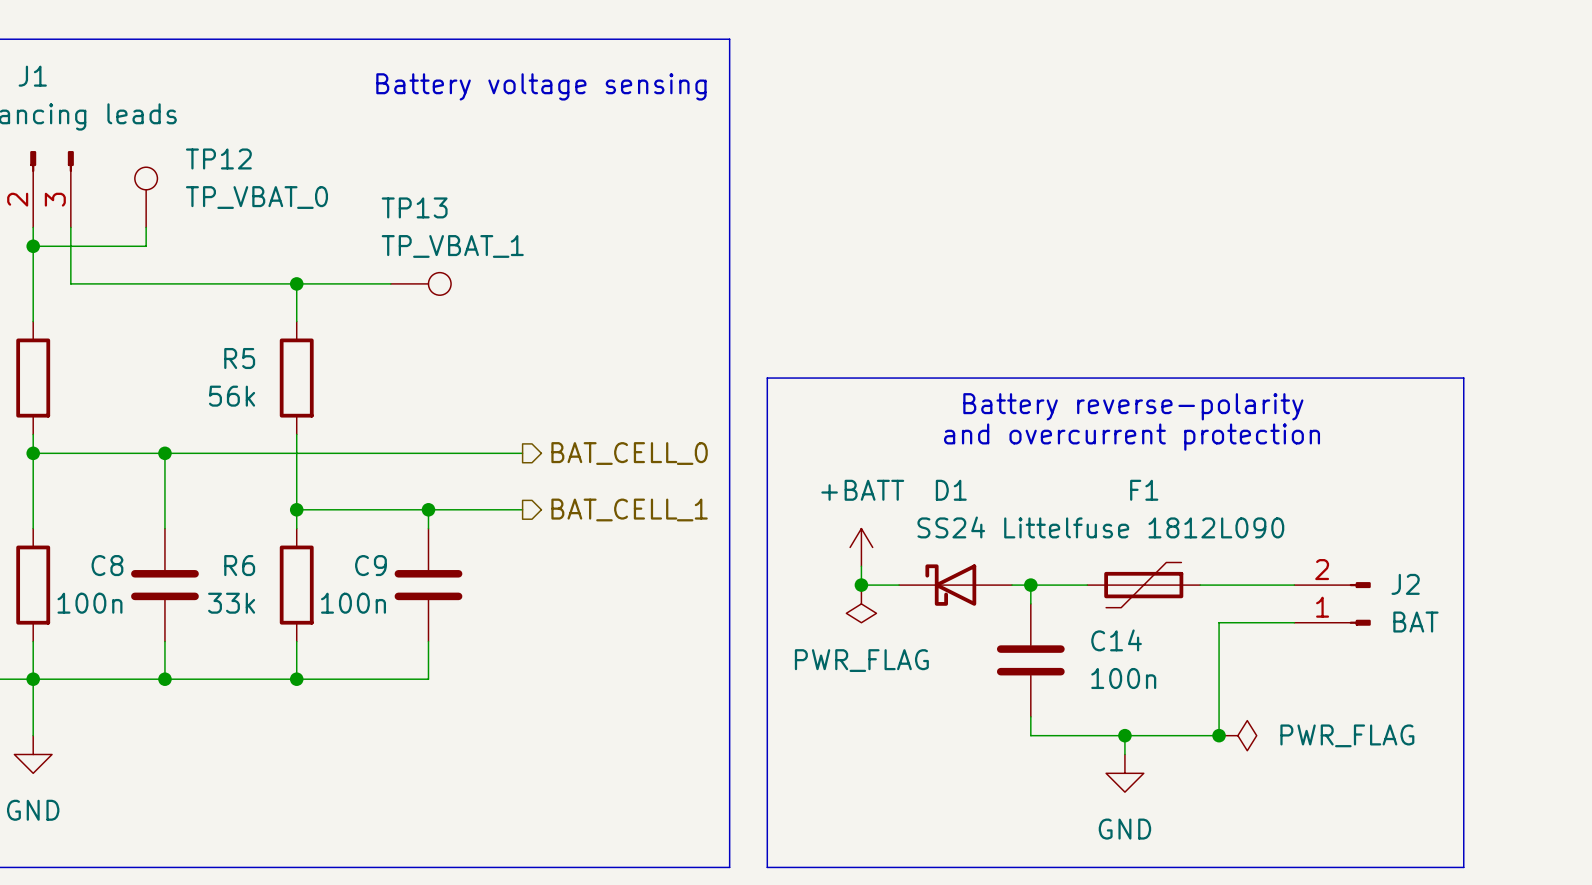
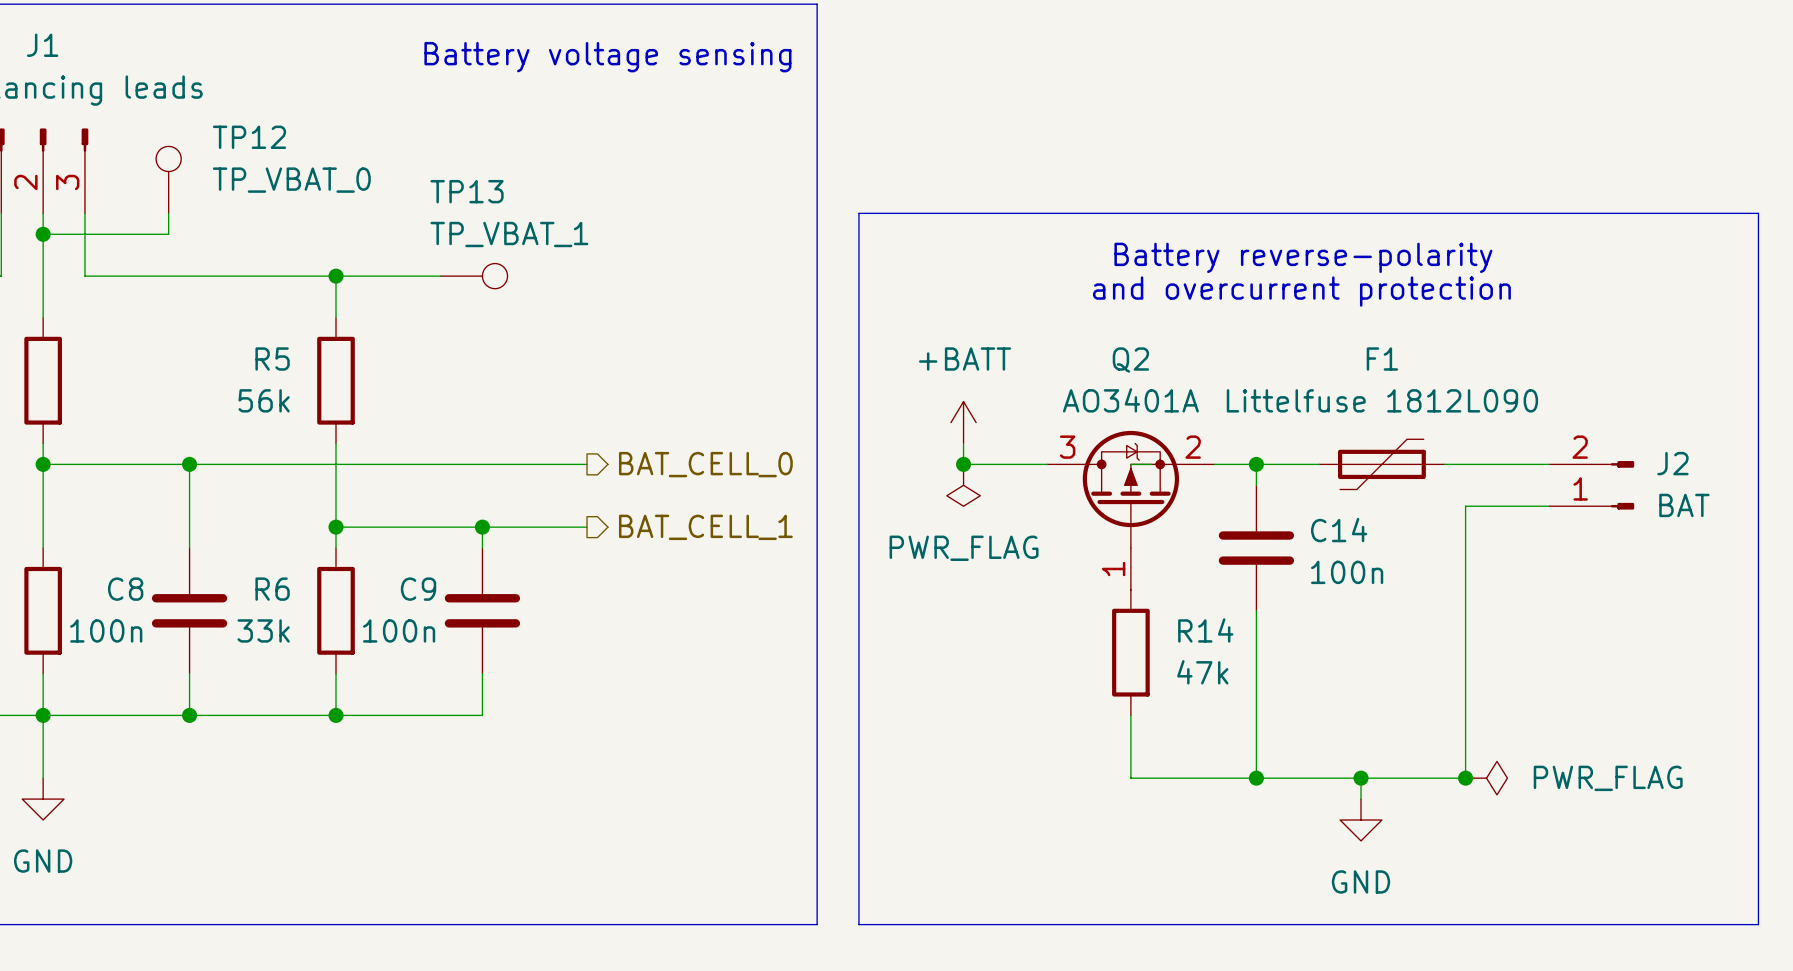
line: (767, 378) (1463, 378) (1463, 867) -> (858, 380) (858, 213) (1758, 213) (1758, 924) (1632, 924)
text position: Battery reverse-polarity (1133, 406) -> Battery reverse-polarity (1303, 257)
wire: none -> (963, 443) (963, 464) (1047, 464)
text position: and overcurrent protection (1132, 437) -> and overcurrent protection (1301, 291)
junction: none -> (963, 464)
wire: none -> (1130, 464) (1151, 464)
wire: none -> (1214, 464) (1319, 464)
junction: none -> (1256, 464)
wire: none -> (1549, 506) (1465, 506) (1465, 778) (1361, 778) (1361, 799)
Q2: none -> AO3401A (1130, 510)
power symbol position: +BATT (861, 547) -> +BATT (963, 422)
wire: (861, 566) (861, 585) (899, 585) -> none
junction: (861, 585) -> none
D1: SS24 (955, 585) -> none
wire: (1012, 585) (1087, 585) -> none
wire: (1030, 585) (1030, 603) -> (1256, 464) (1256, 485)
junction: (1030, 585) -> none
F1 position: (1143, 585) -> (1381, 464)
wire: (1200, 585) (1294, 585) -> (1444, 464) (1549, 464)
power symbol position: PWR_FLAG (861, 603) -> PWR_FLAG (963, 485)
J2 position: (1332, 603) -> (1591, 485)
R14: none -> 47k (1130, 652)
wire: (1294, 622) (1219, 622) (1219, 735) -> none
C14 name position: C14 (1116, 640) -> C14 (1339, 530)
C14 position: (1030, 660) -> (1256, 548)
C14 value position: 100n (1123, 678) -> 100n (1347, 572)
wire: (1030, 716) (1030, 735) -> (1130, 715) (1130, 778) (1151, 778)
wire: (1124, 735) (1124, 754) -> (1256, 778) (1256, 610)
power symbol position: PWR_FLAG (1237, 735) -> PWR_FLAG (1486, 778)
junction: none -> (1465, 778)
power symbol position: GND (1124, 773) -> GND (1361, 820)

